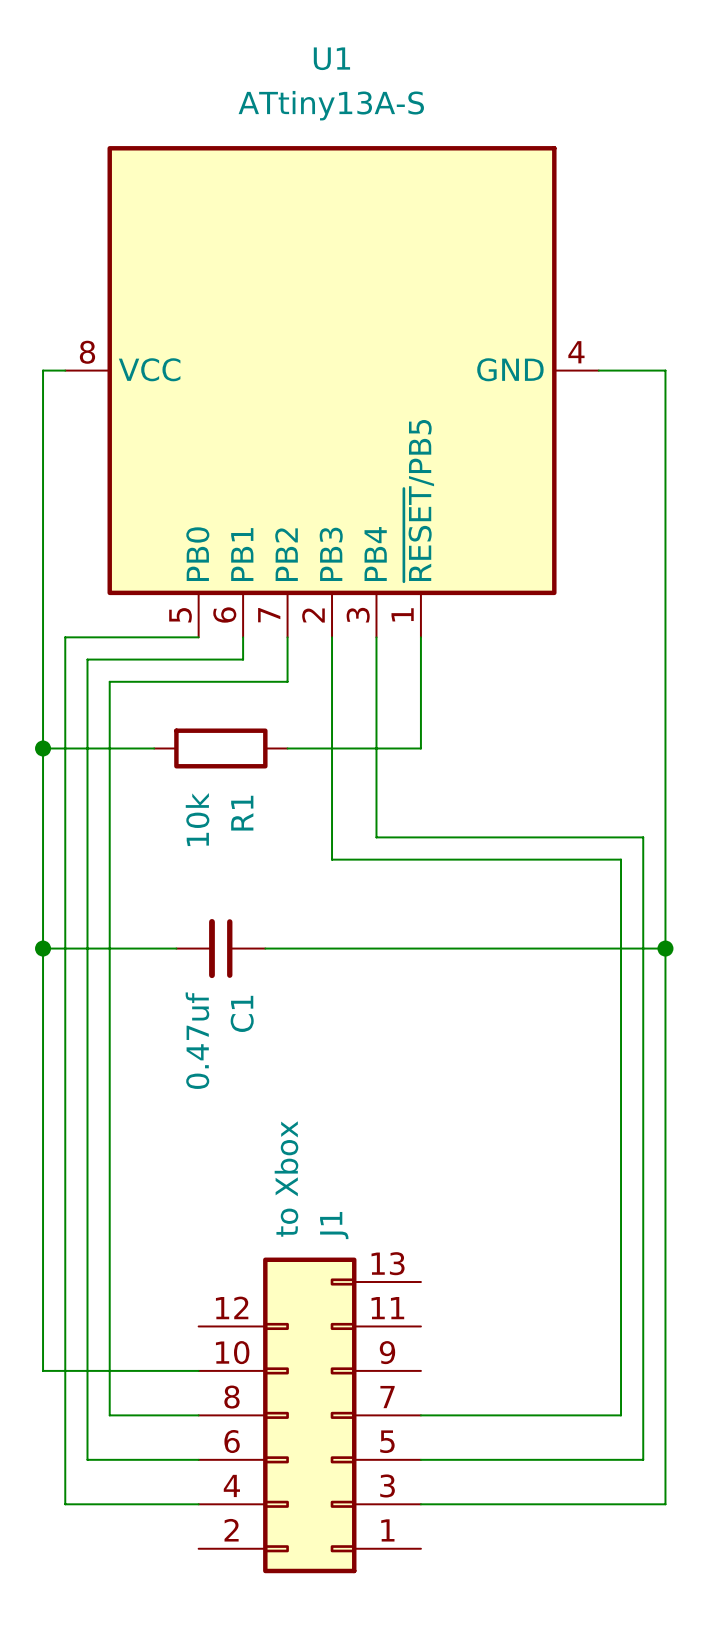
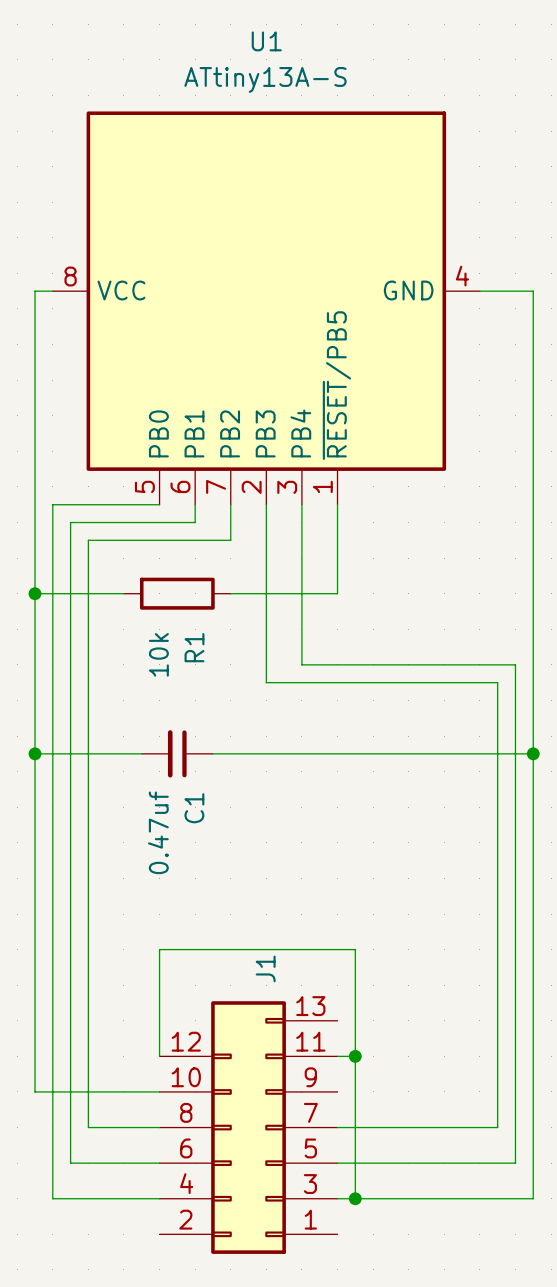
J1 value: to Xbox (286, 1179) -> none
wire: none -> (159, 1056) (159, 949) (355, 949) (355, 1198)
wire: none -> (337, 1056) (355, 1056)
junction: none -> (355, 1056)
junction: none -> (355, 1198)

